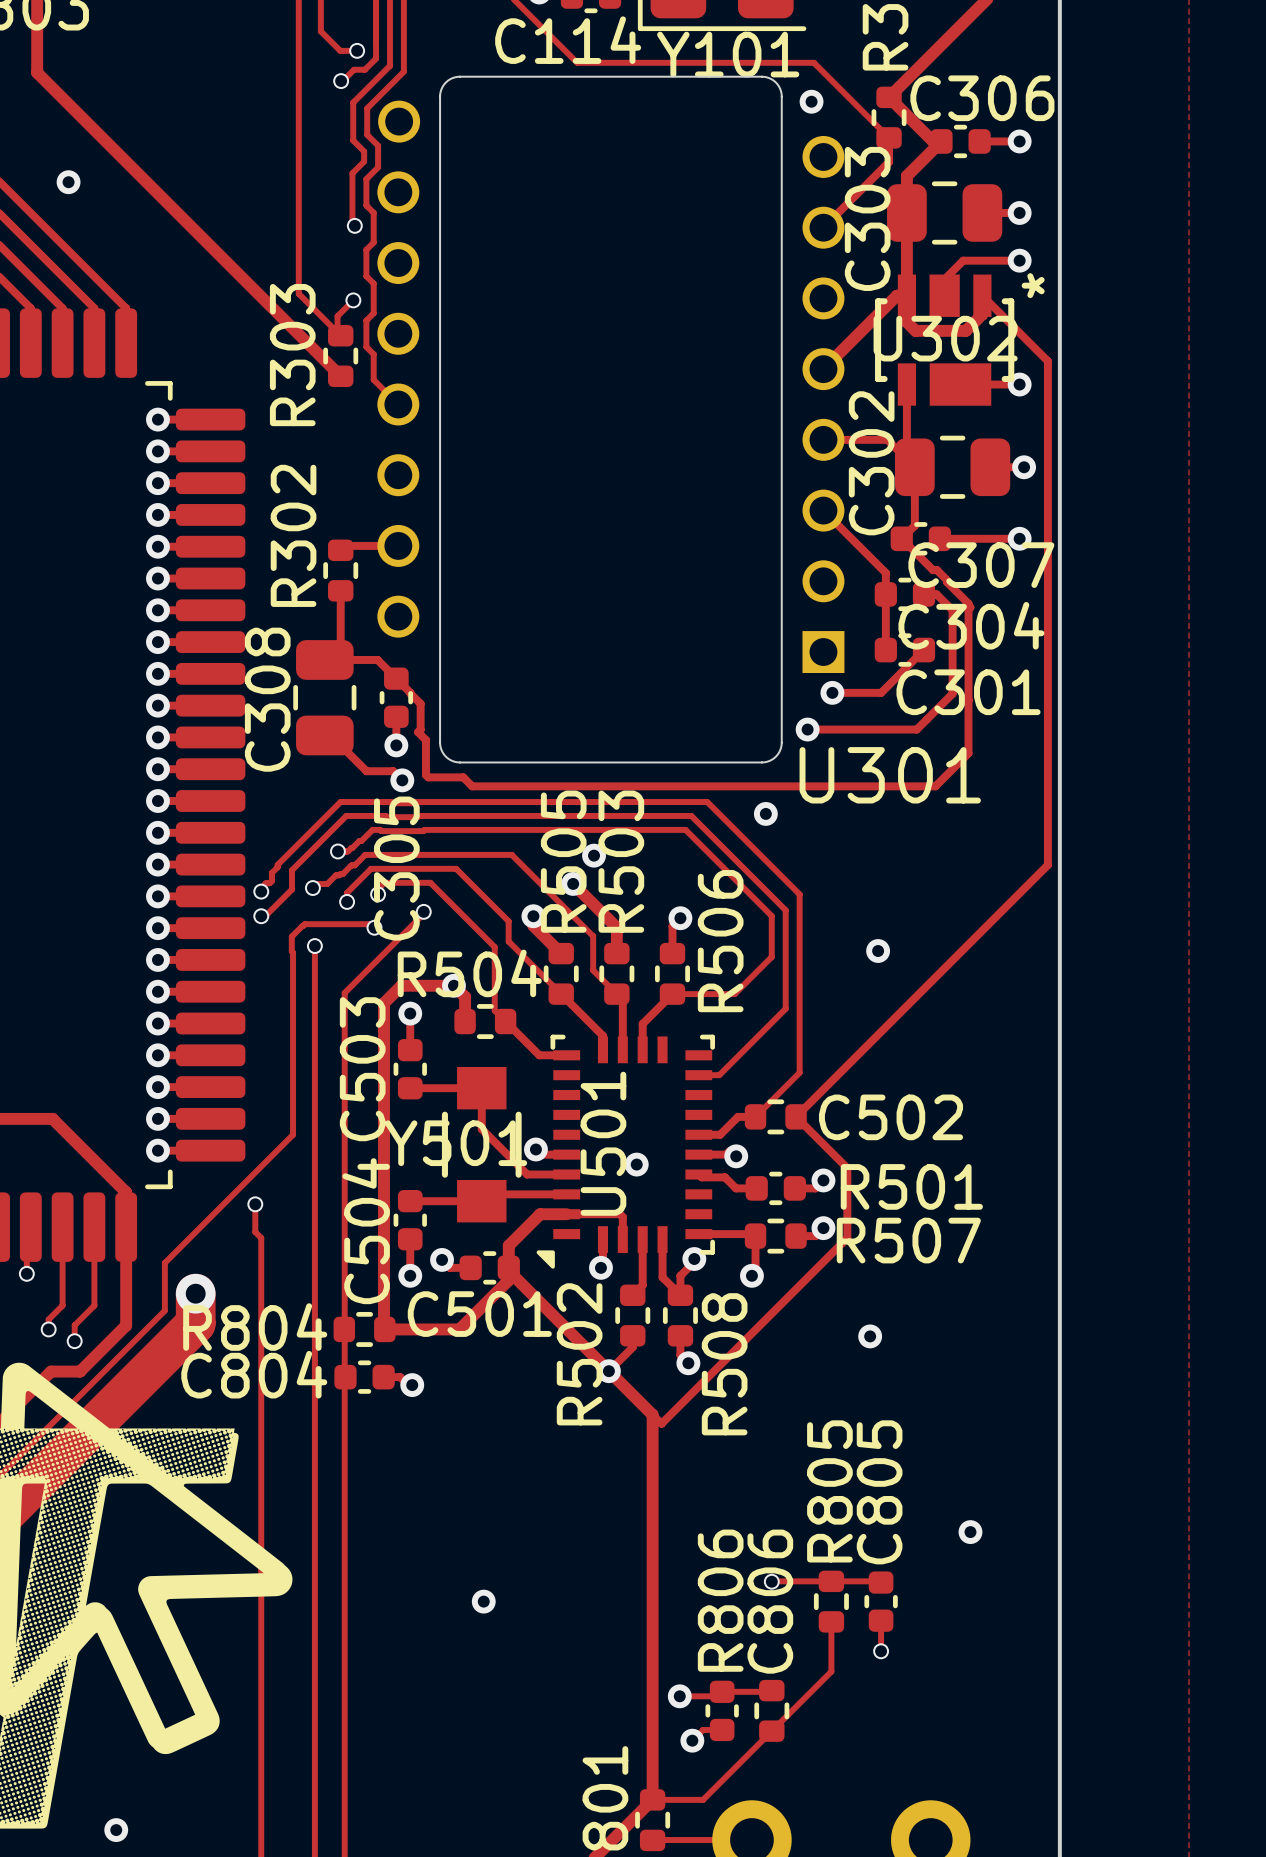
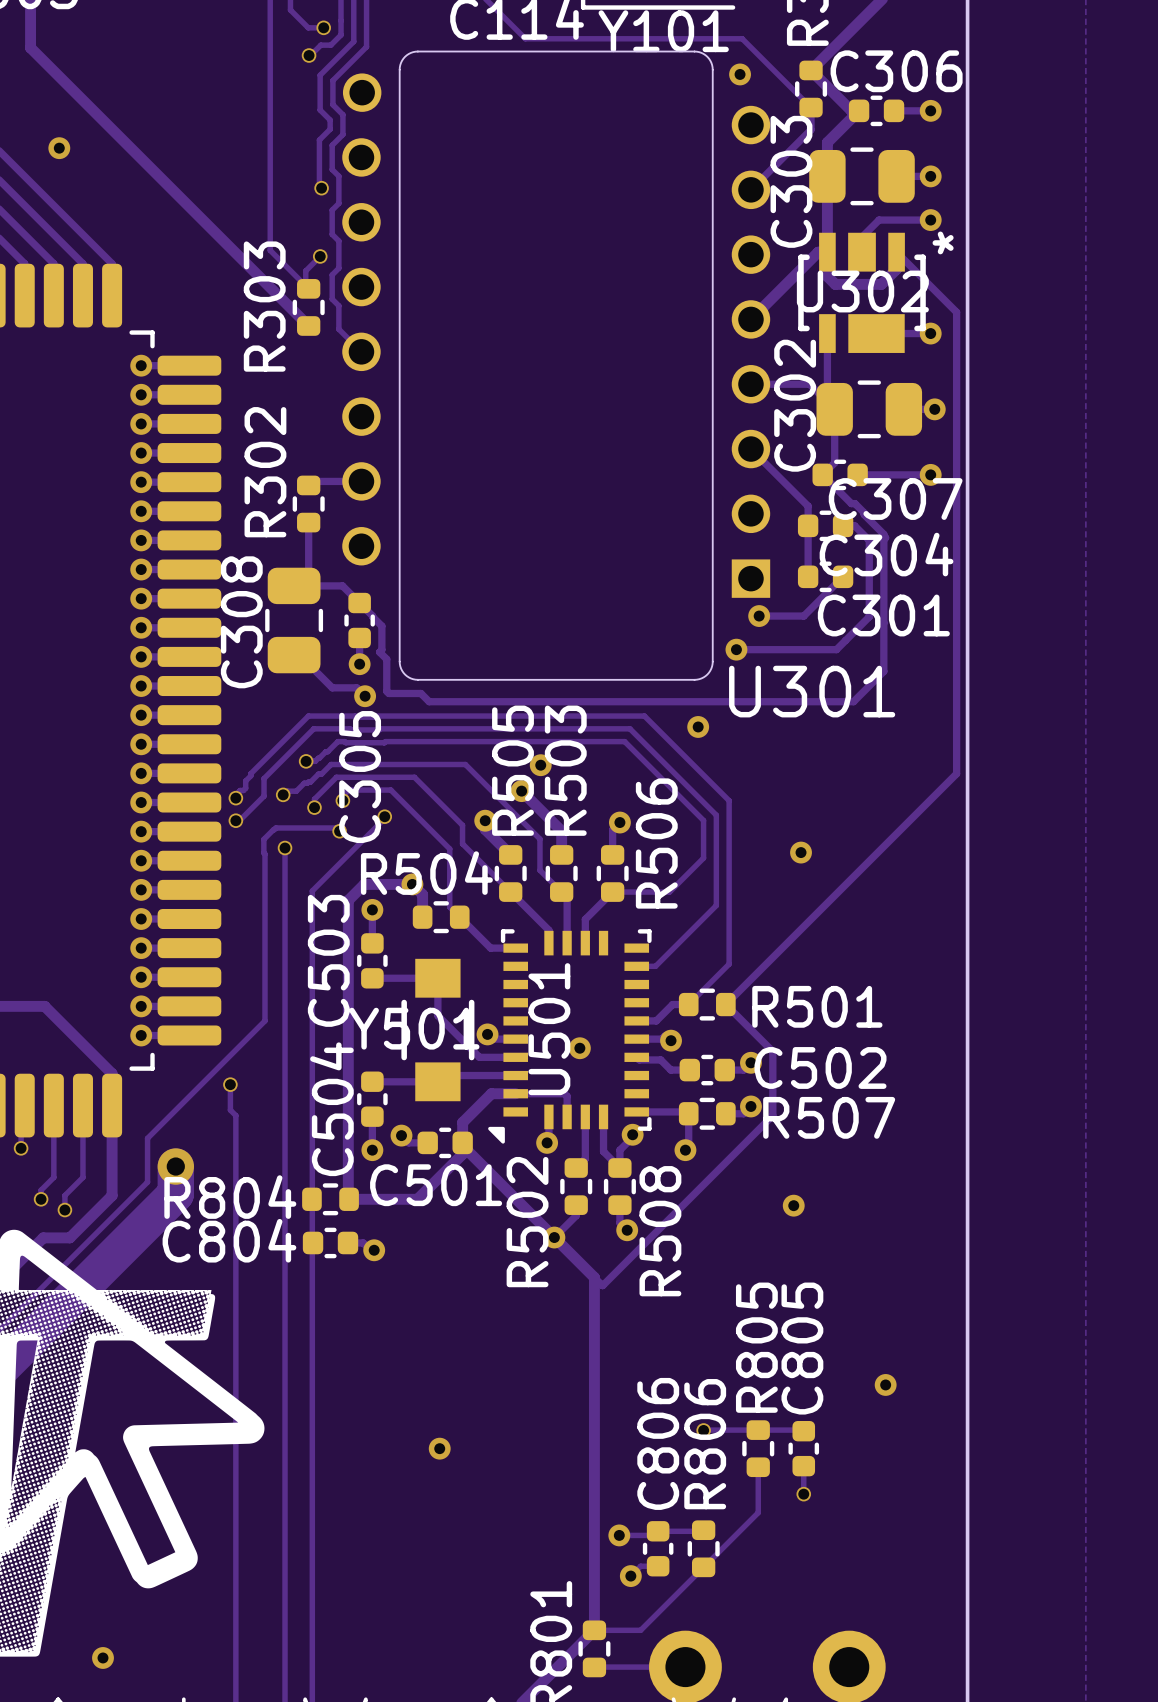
C502 name position: C502 (891, 1117) -> C502 (820, 1067)
R501 name position: R501 (911, 1186) -> R501 (817, 1006)
R806 name position: R806 (720, 1600) -> R806 (705, 1444)
C806 name position: C806 (770, 1601) -> C806 (658, 1443)

